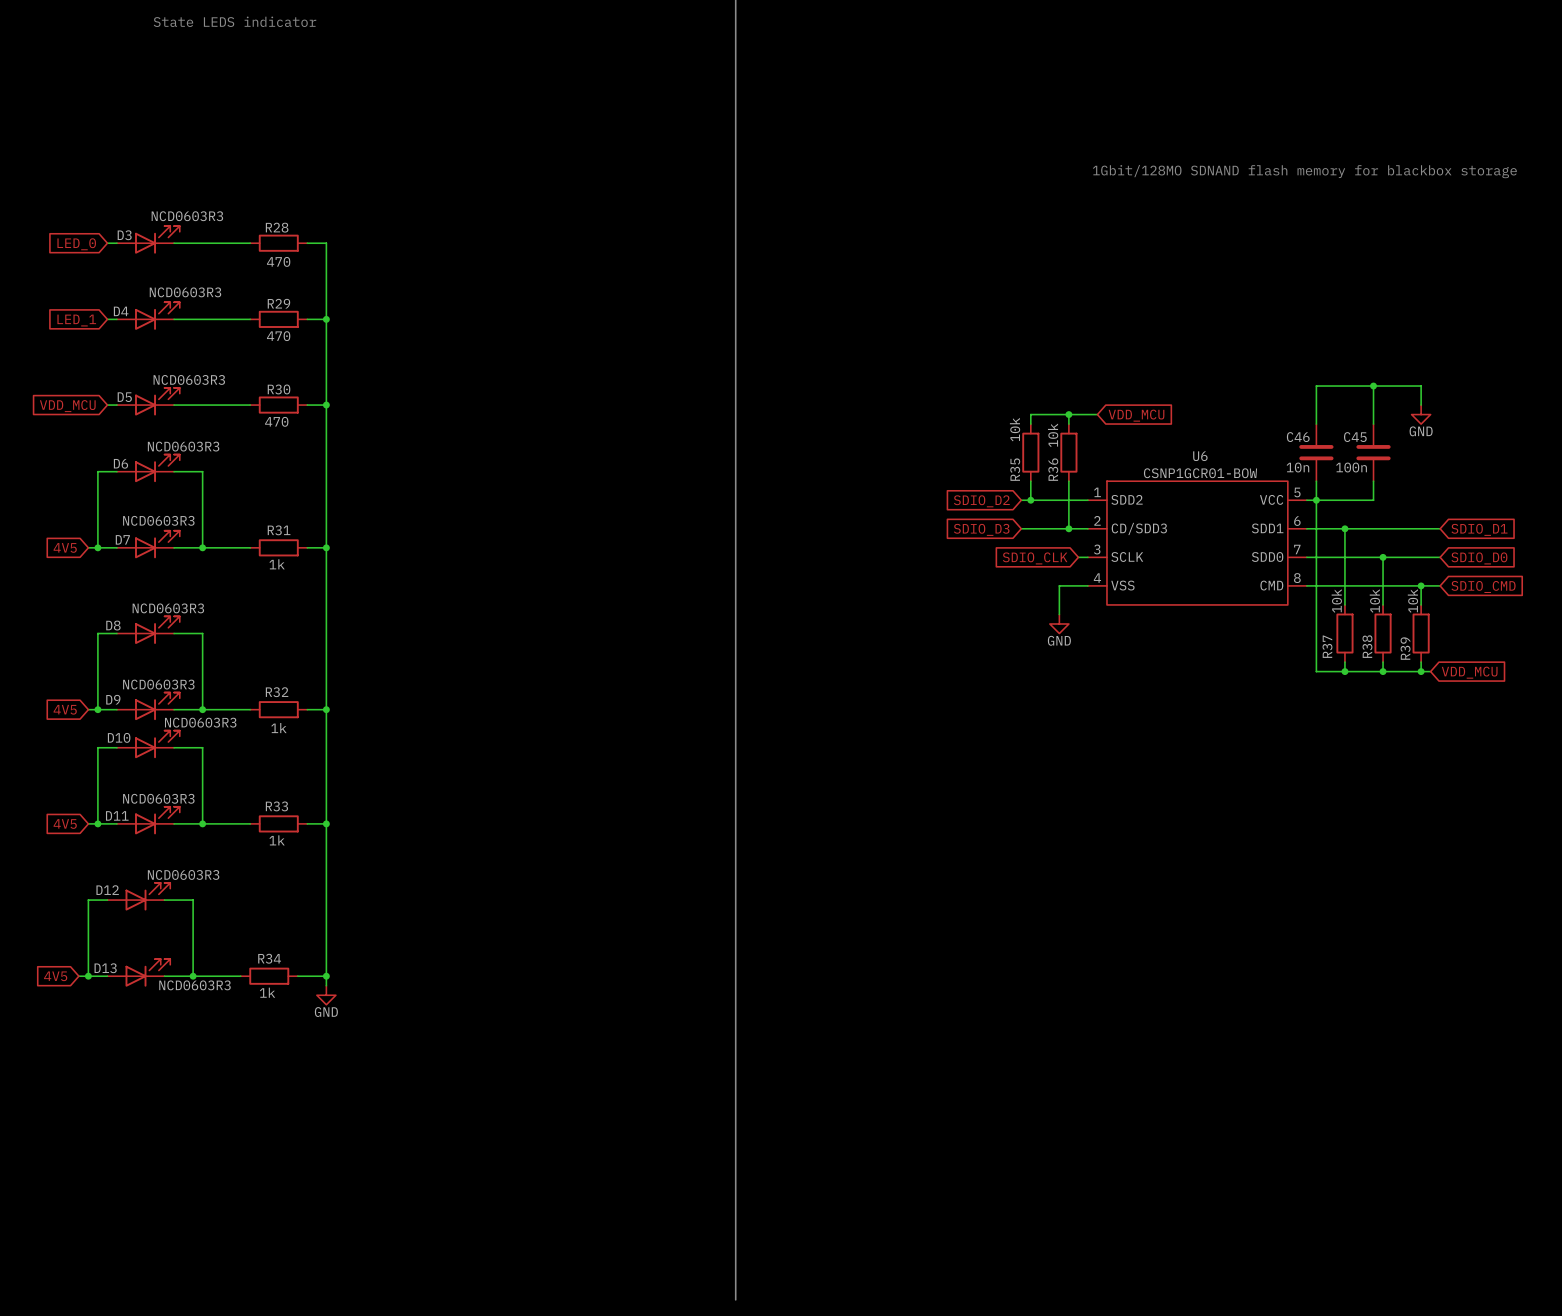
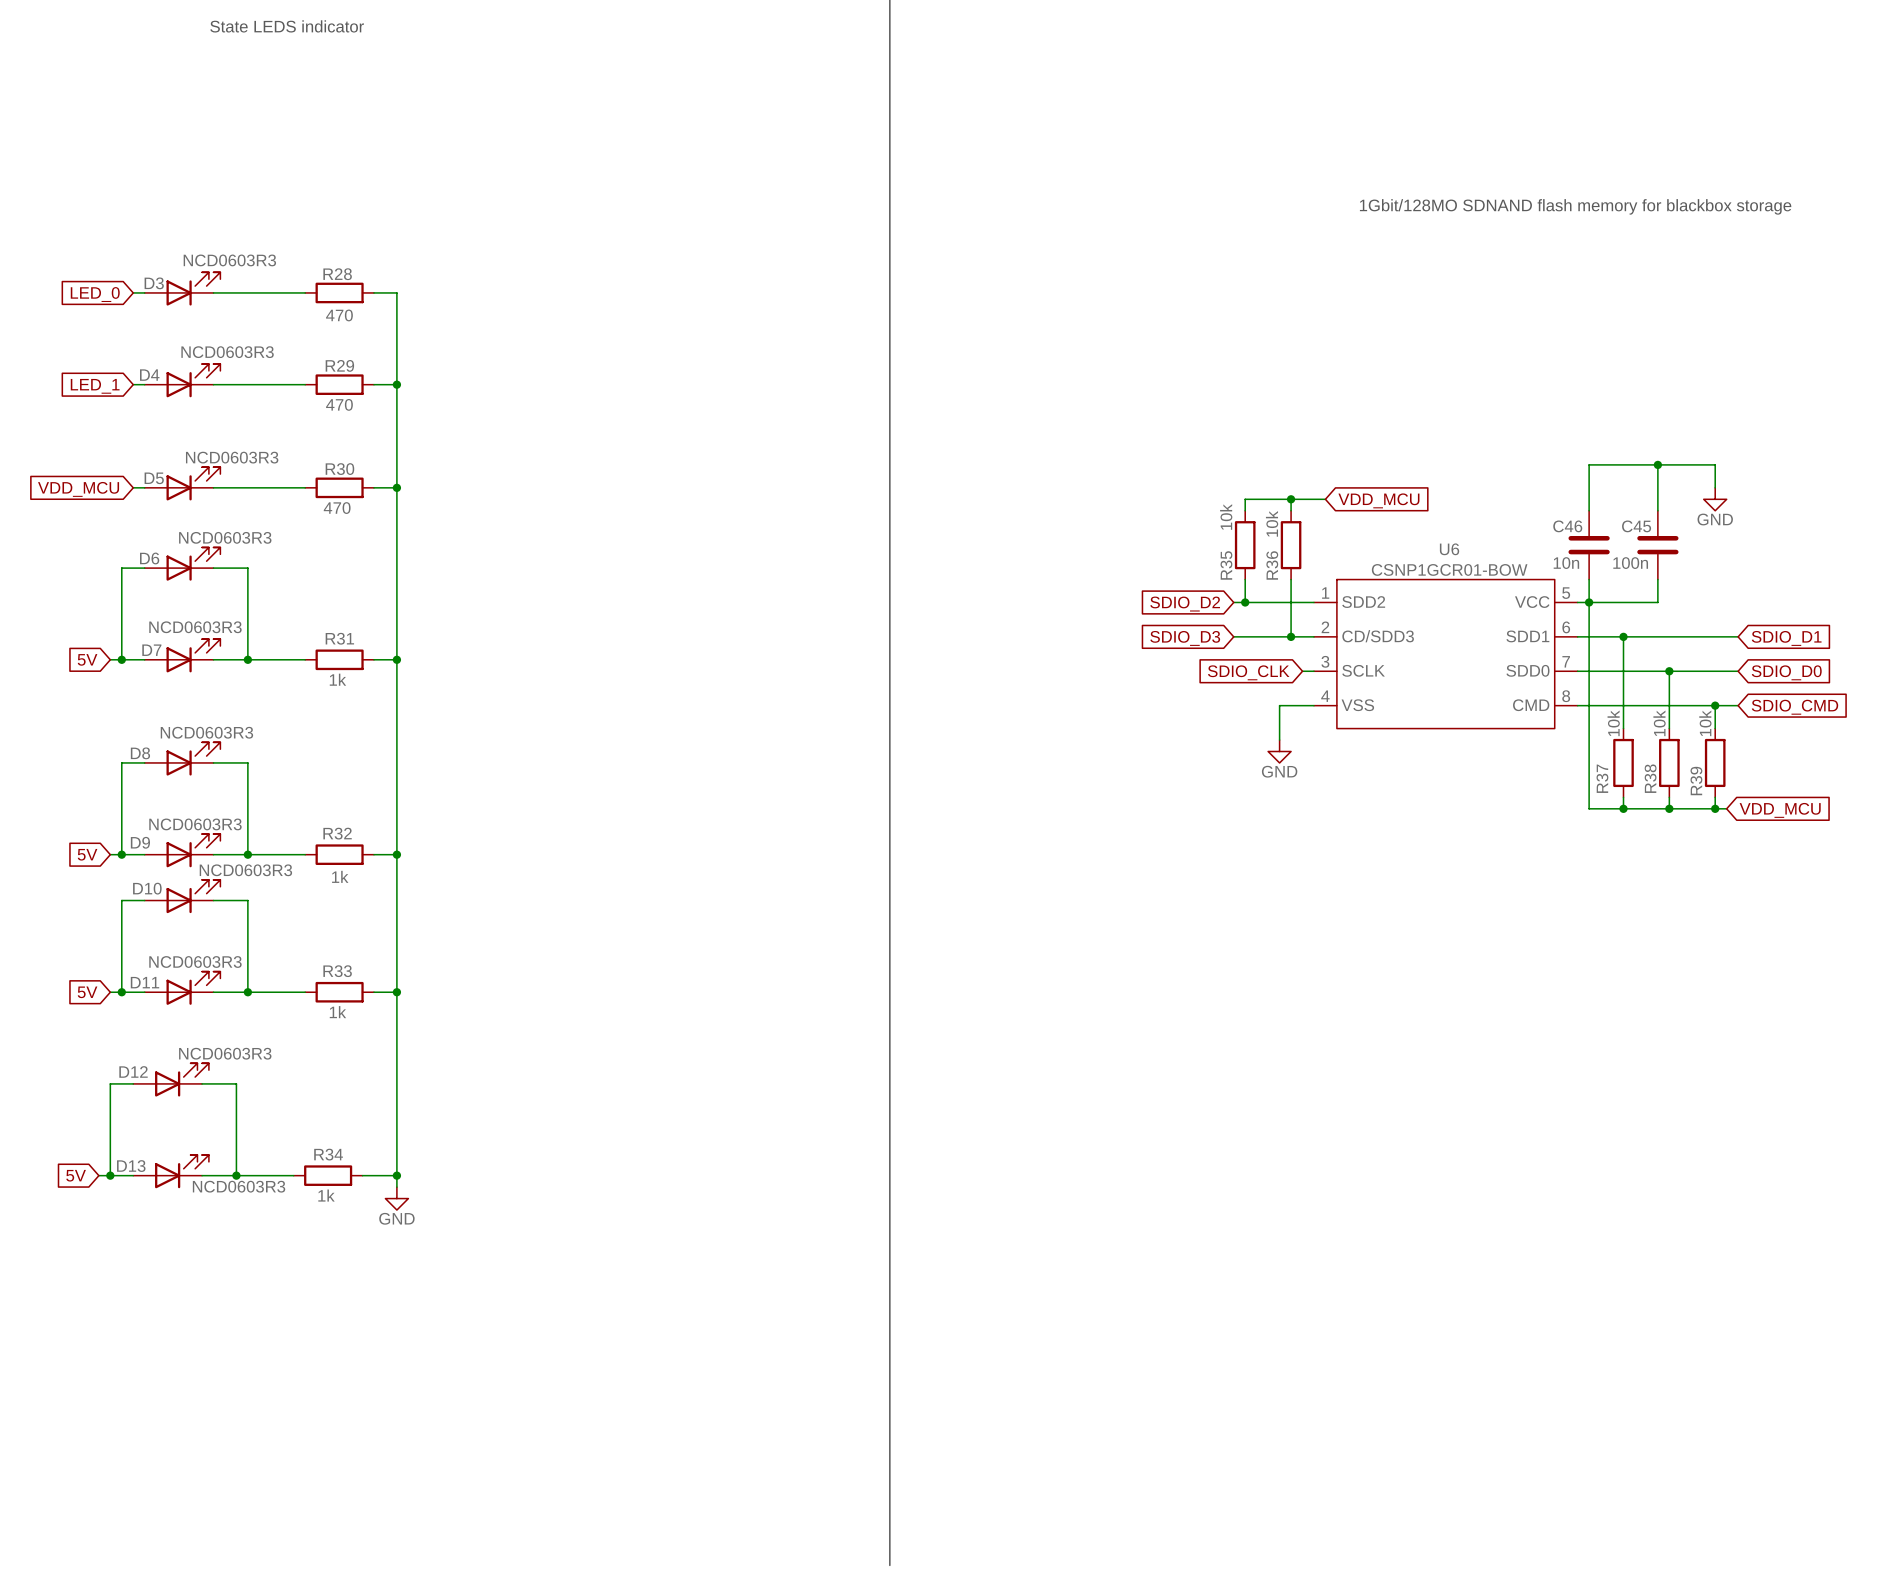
global label: 4V5 (65, 547) -> 5V (87, 659)
global label: 4V5 (65, 709) -> 5V (87, 854)
global label: 4V5 (65, 823) -> 5V (87, 992)
global label: 4V5 (55, 976) -> 5V (76, 1175)

